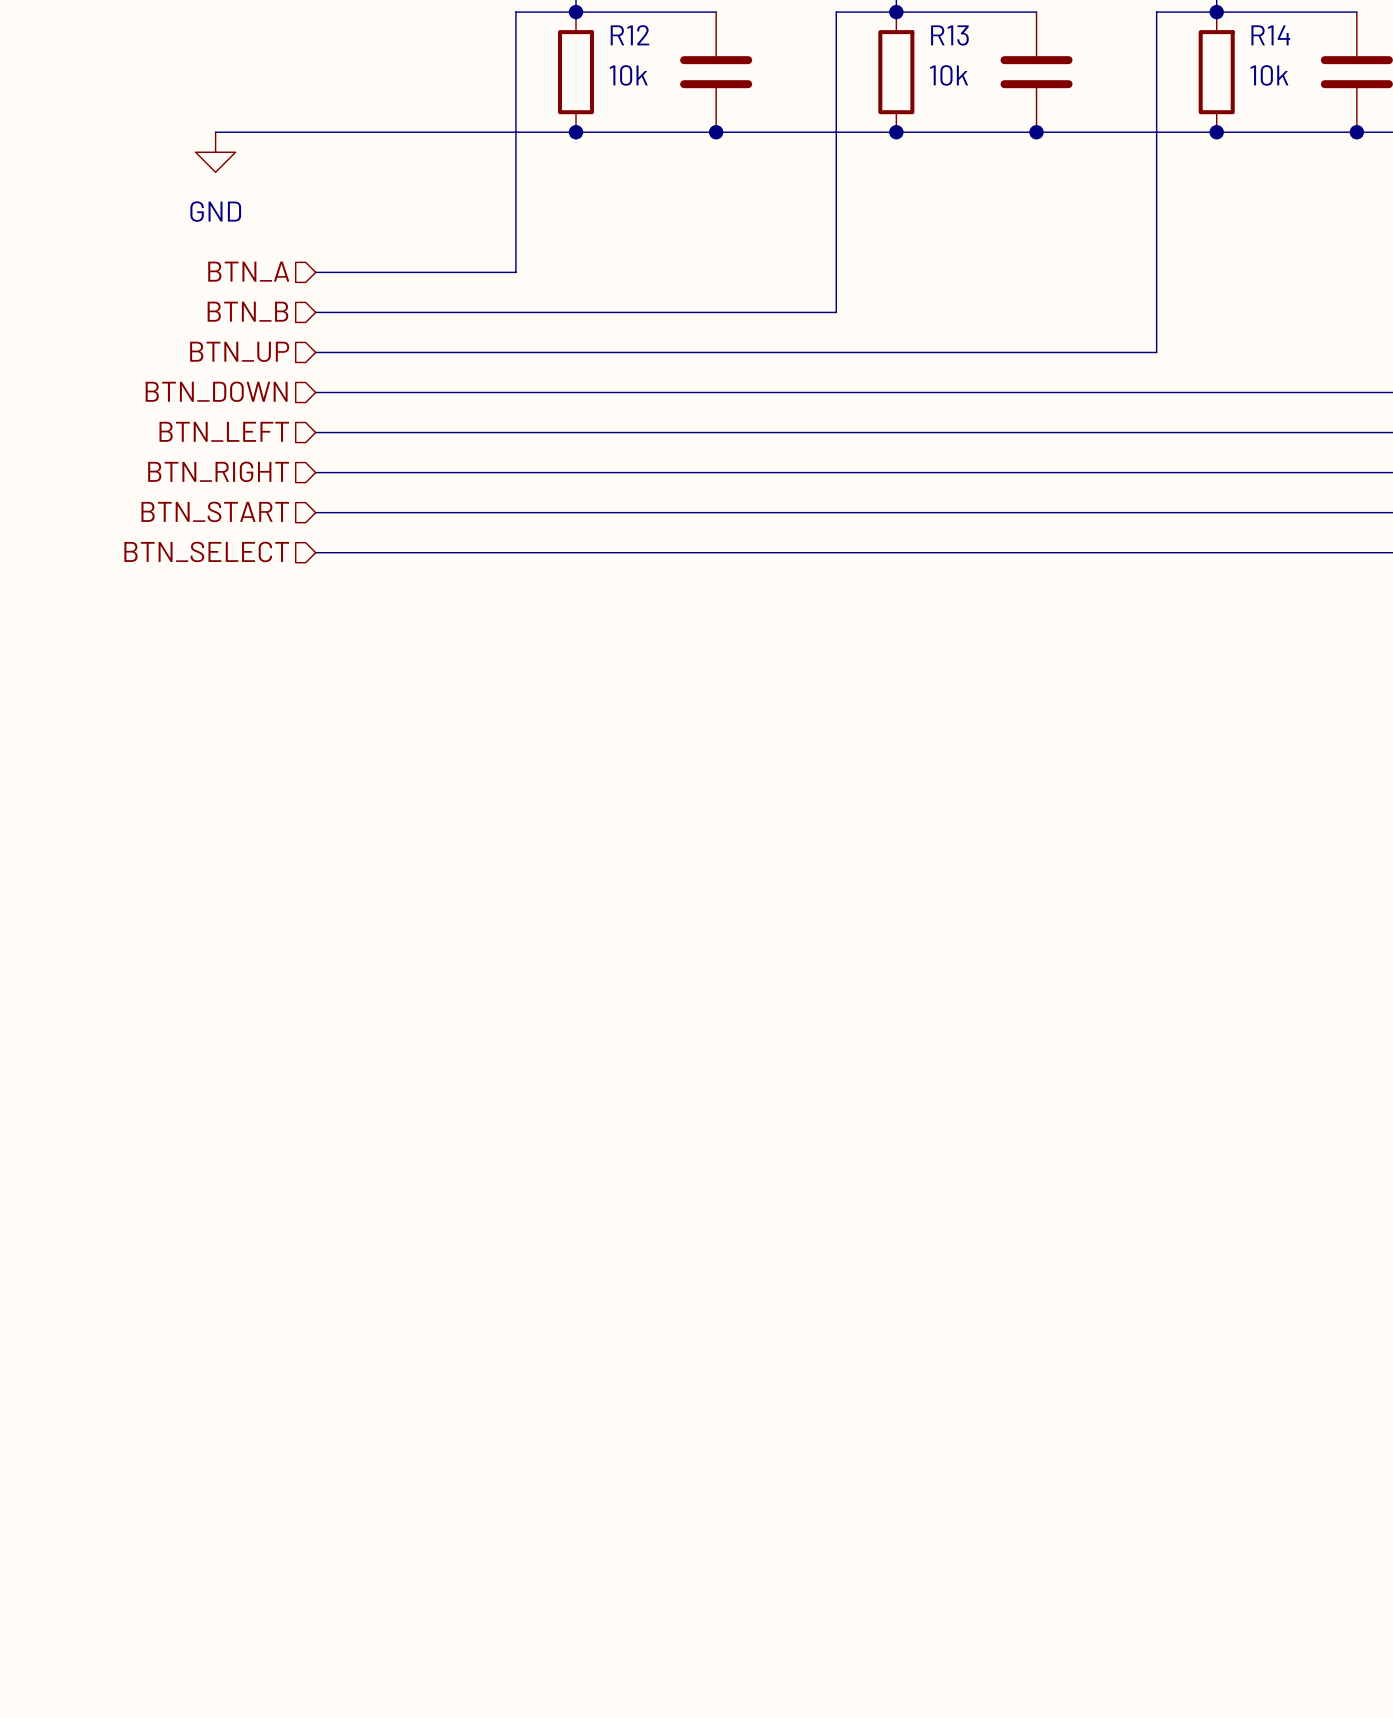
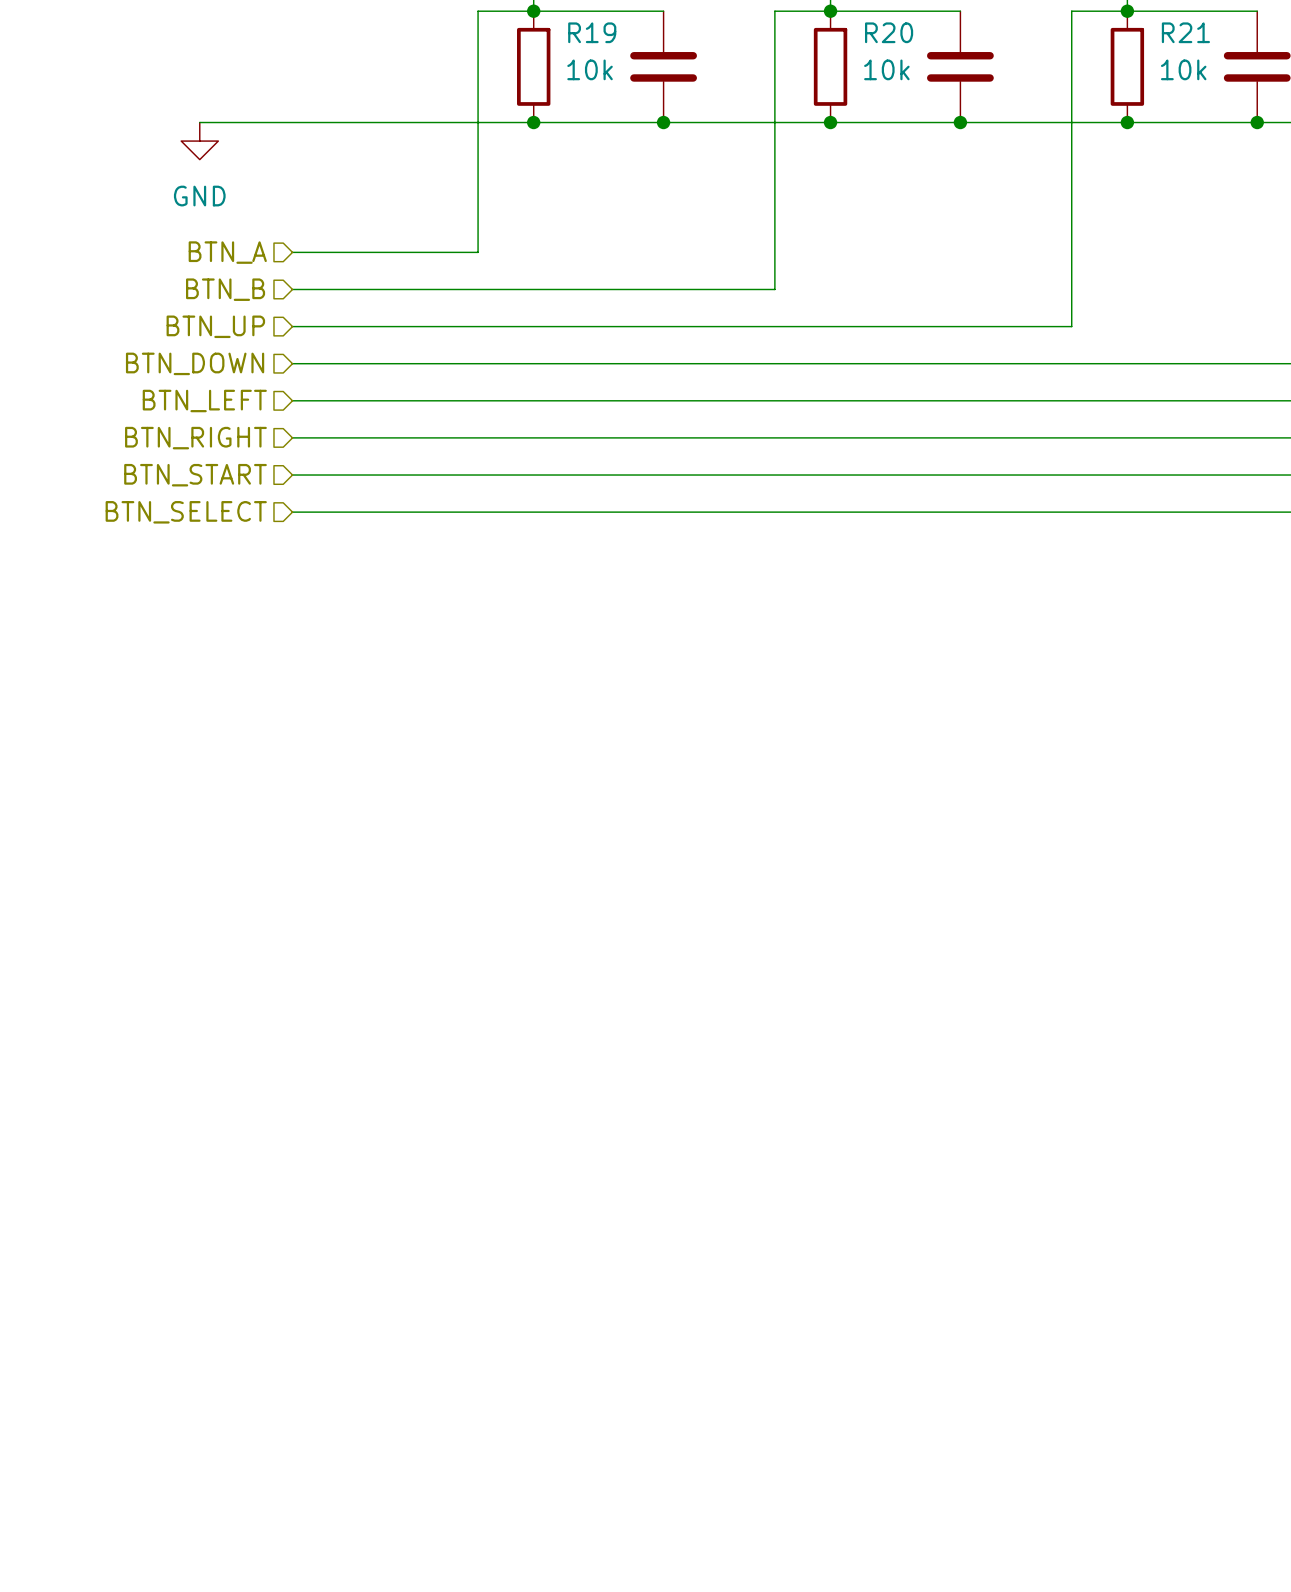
R12 name: R12 (629, 35) -> R19 (592, 32)
R13 name: R13 (949, 35) -> R20 (889, 32)
R14 name: R14 (1270, 35) -> R21 (1185, 32)

